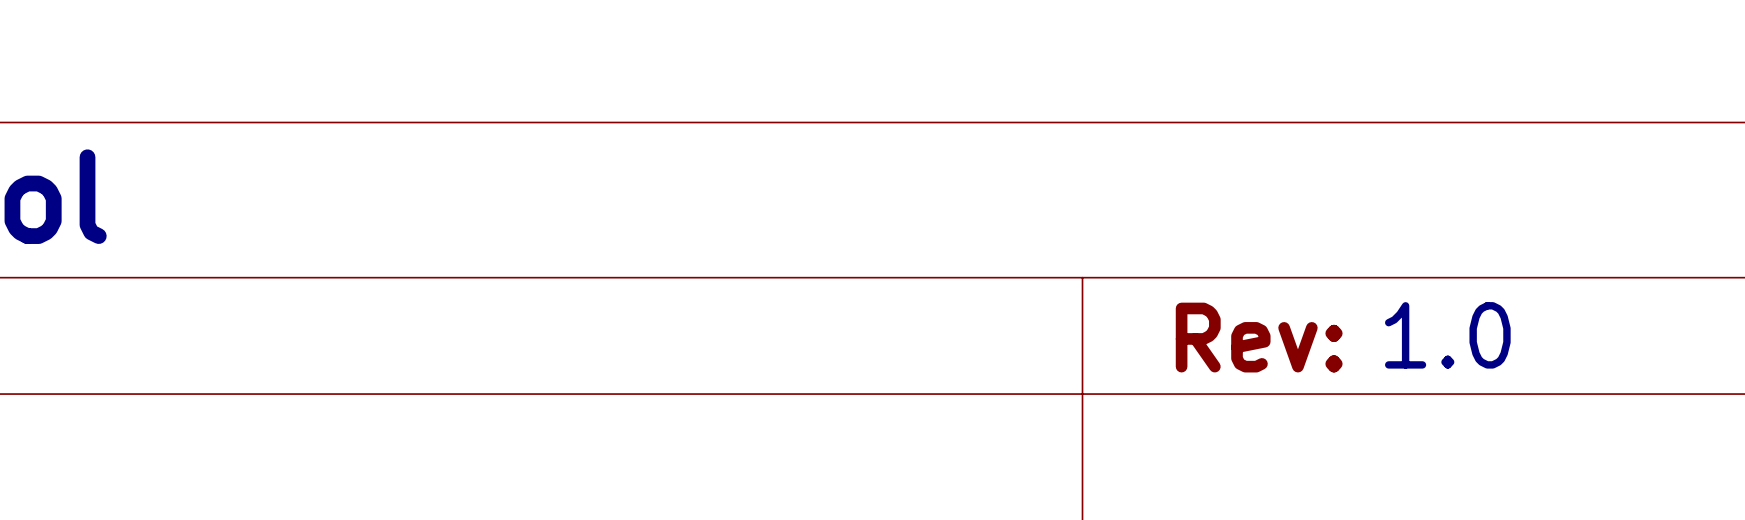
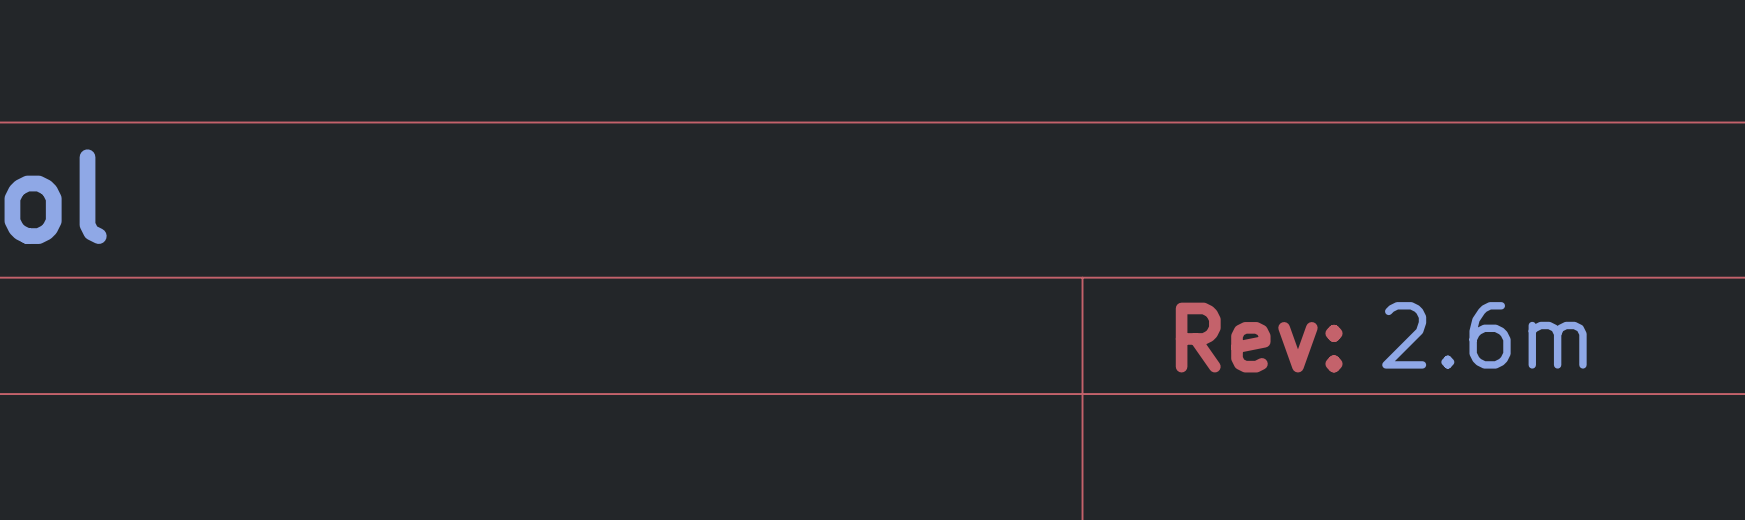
text: 1.0 (1447, 335) -> 2.6m (1484, 335)

